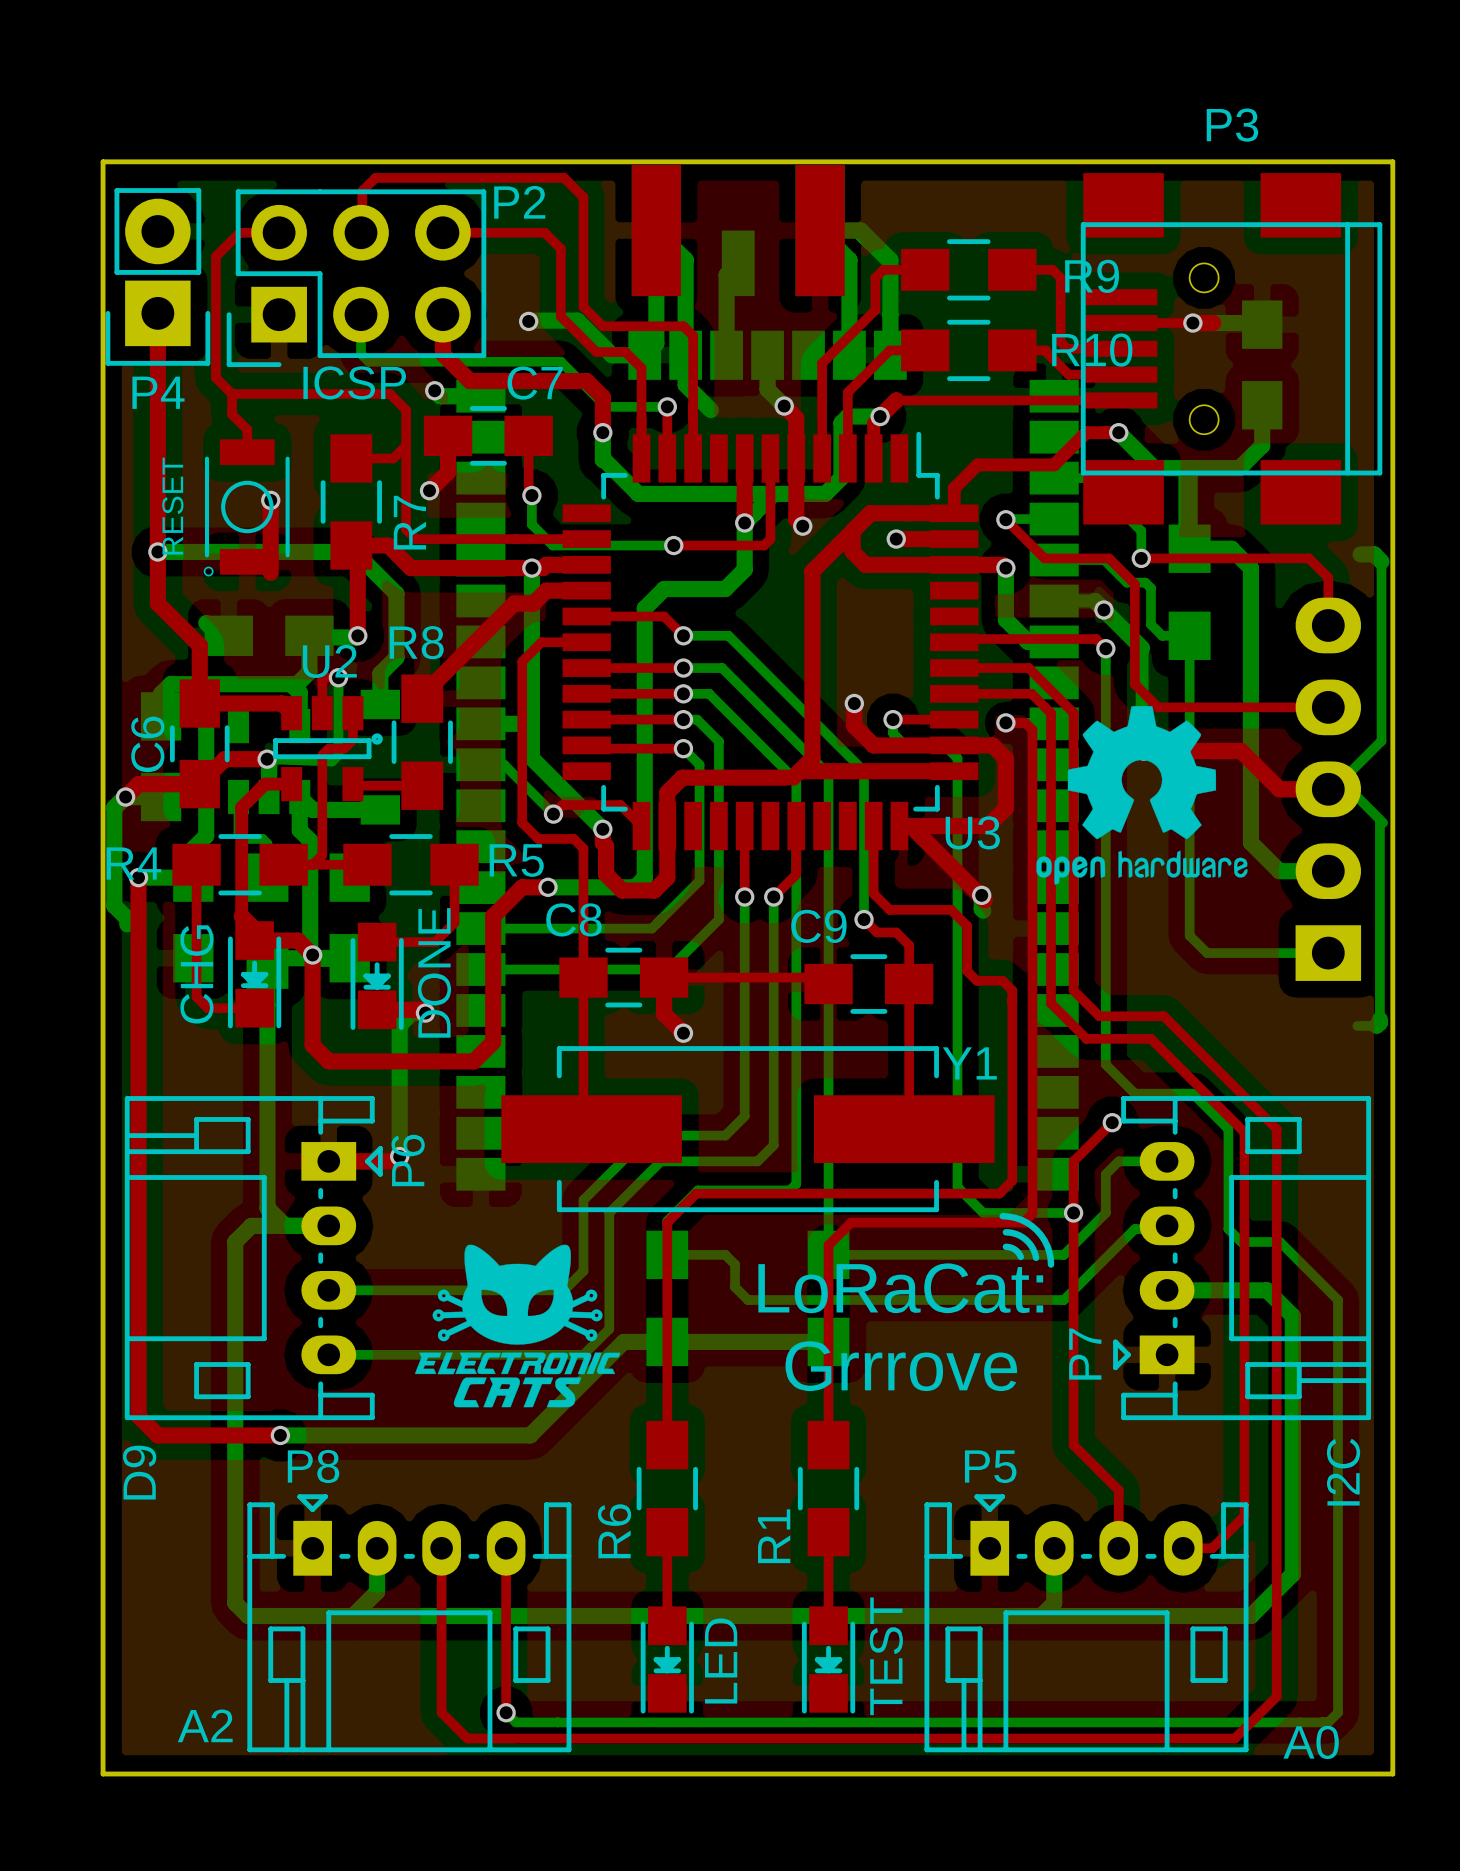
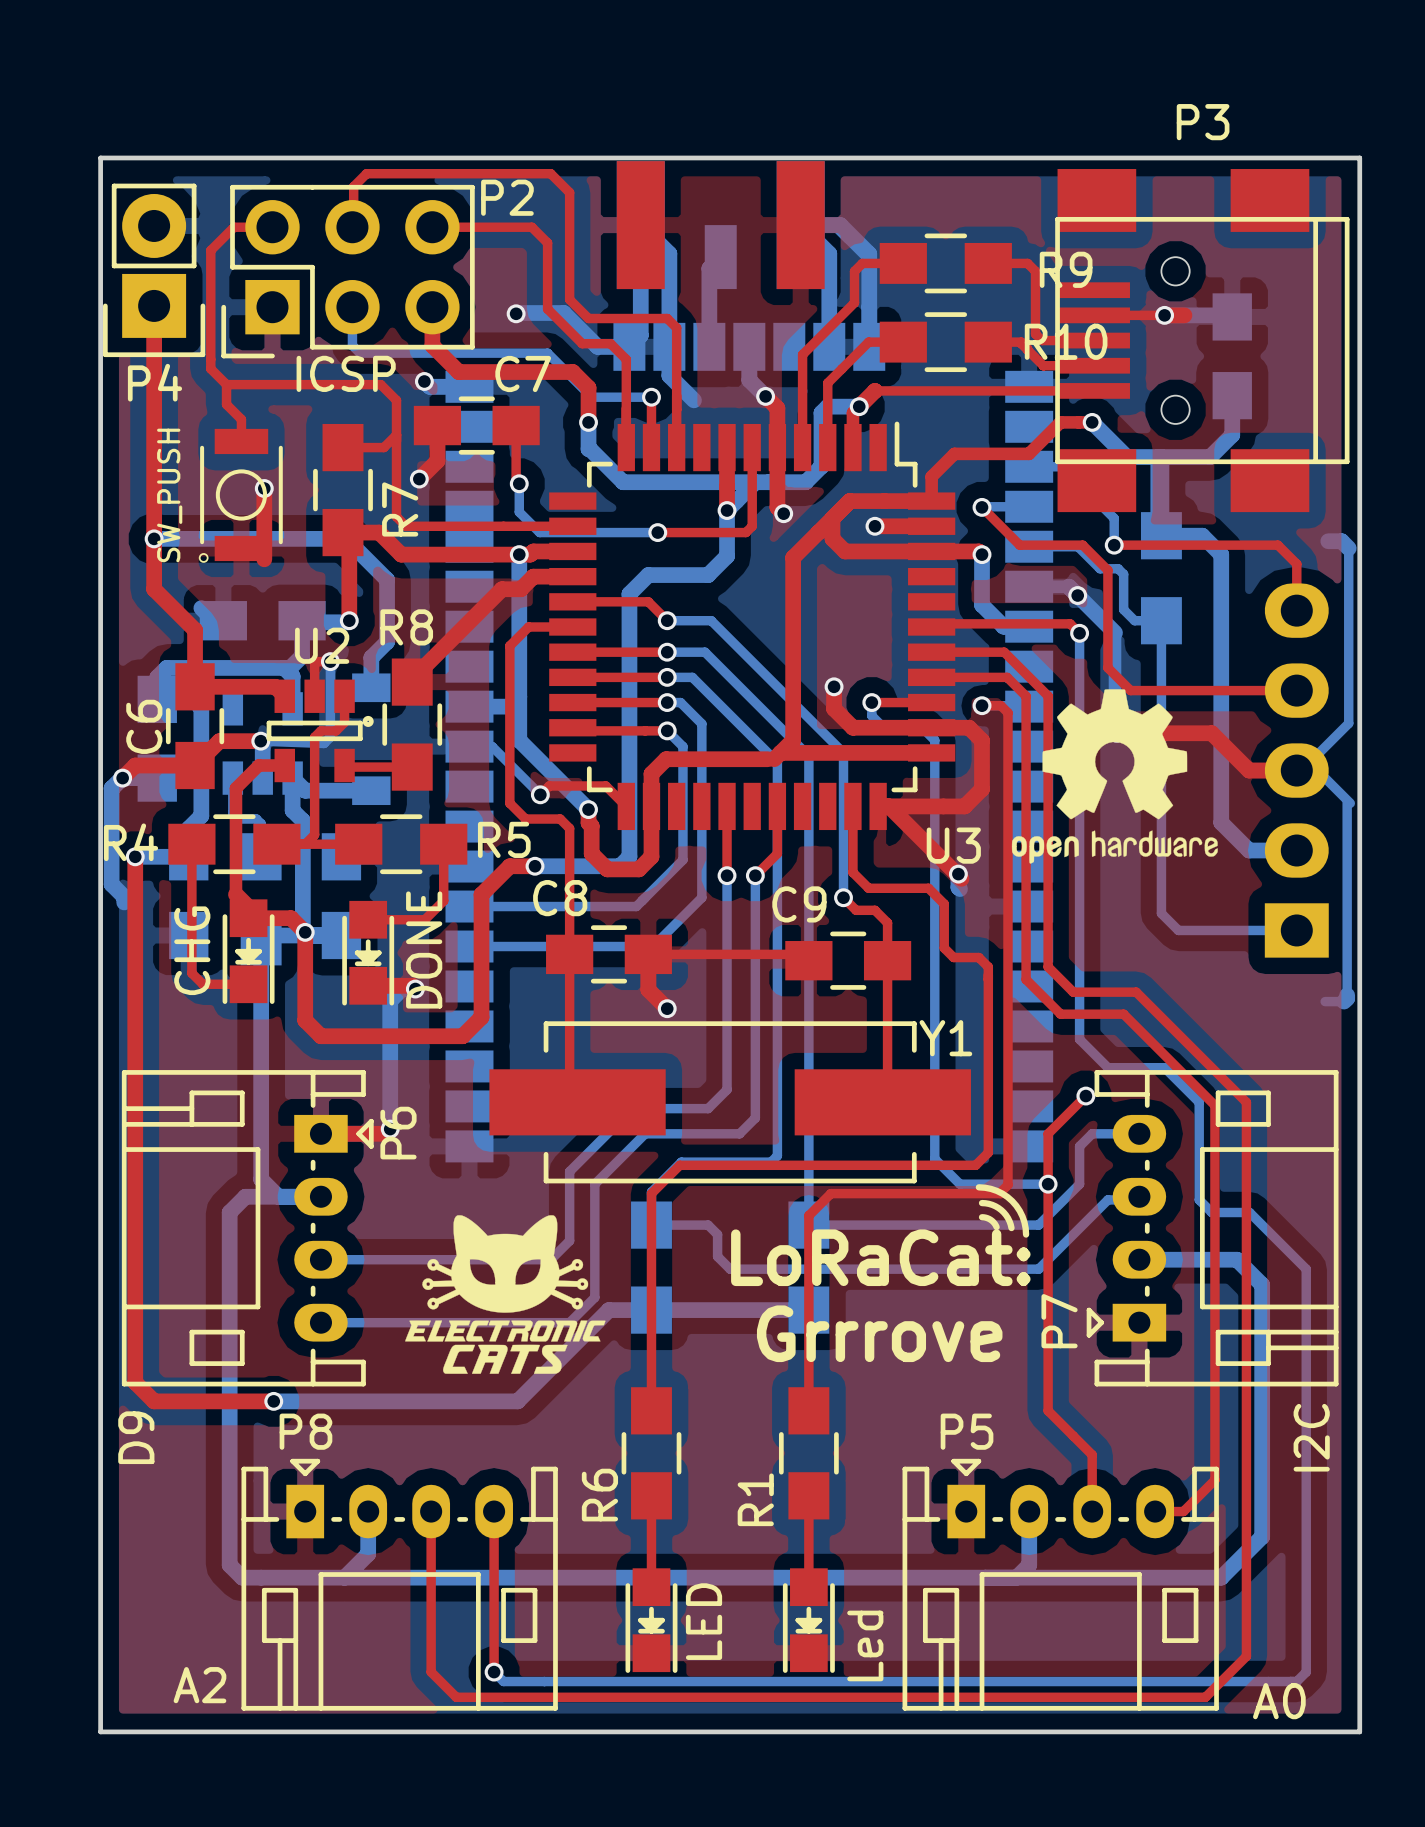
part value: RESET (172, 506) -> SW_PUSH (169, 495)
U3 name position: U3 (972, 832) -> U3 (953, 845)
part value: TEST (886, 1656) -> Led (865, 1645)

